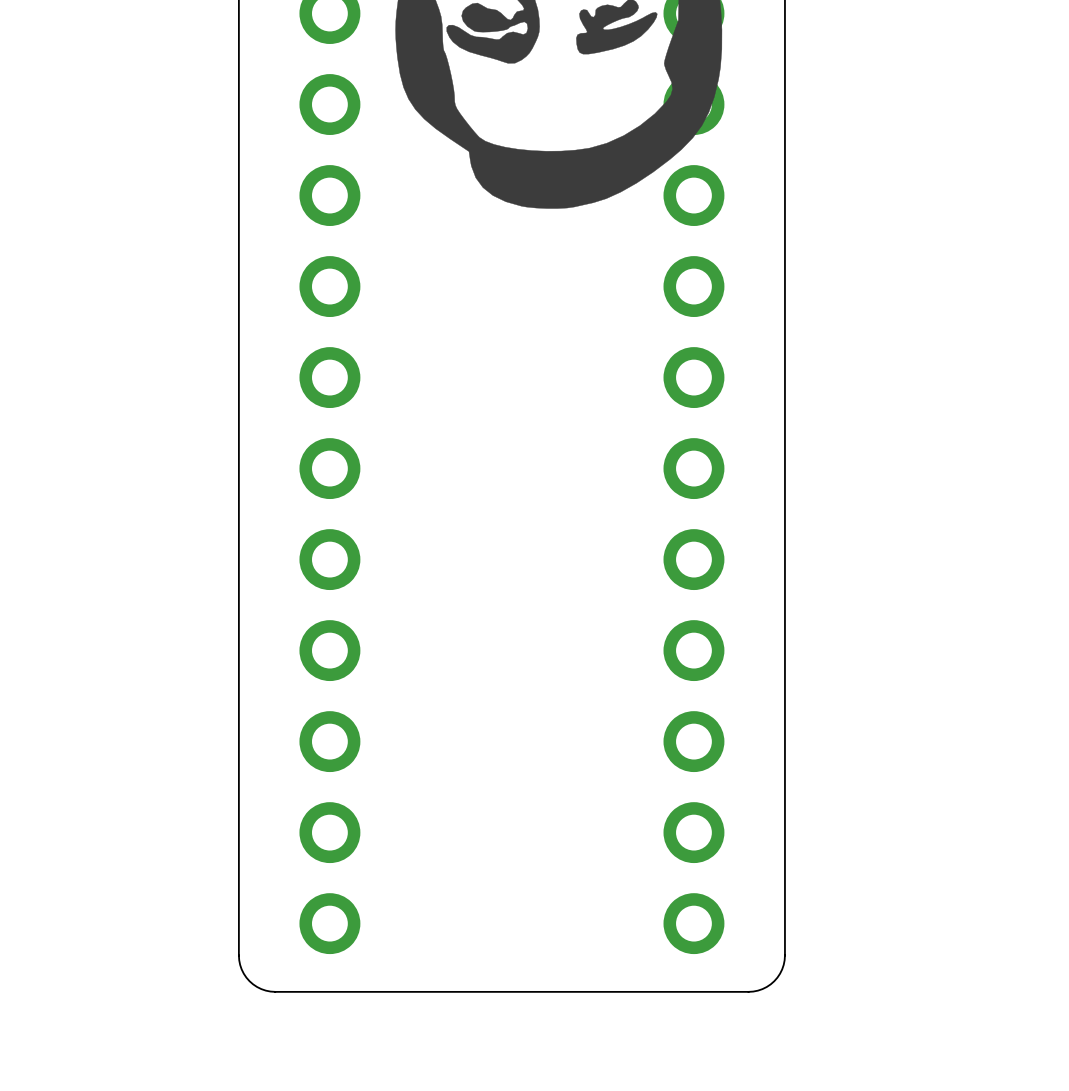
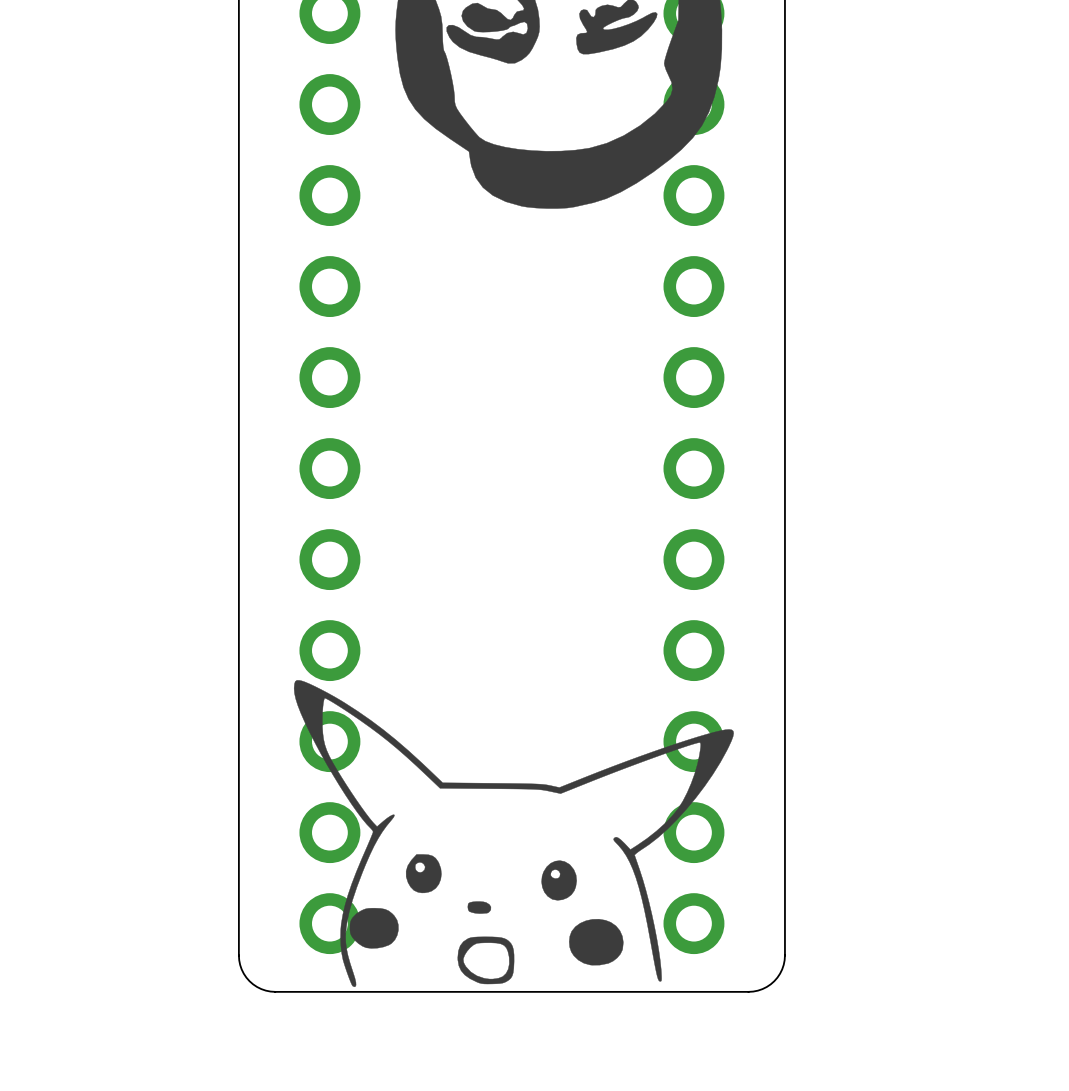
drawing: none -> [293, 680, 734, 988]

